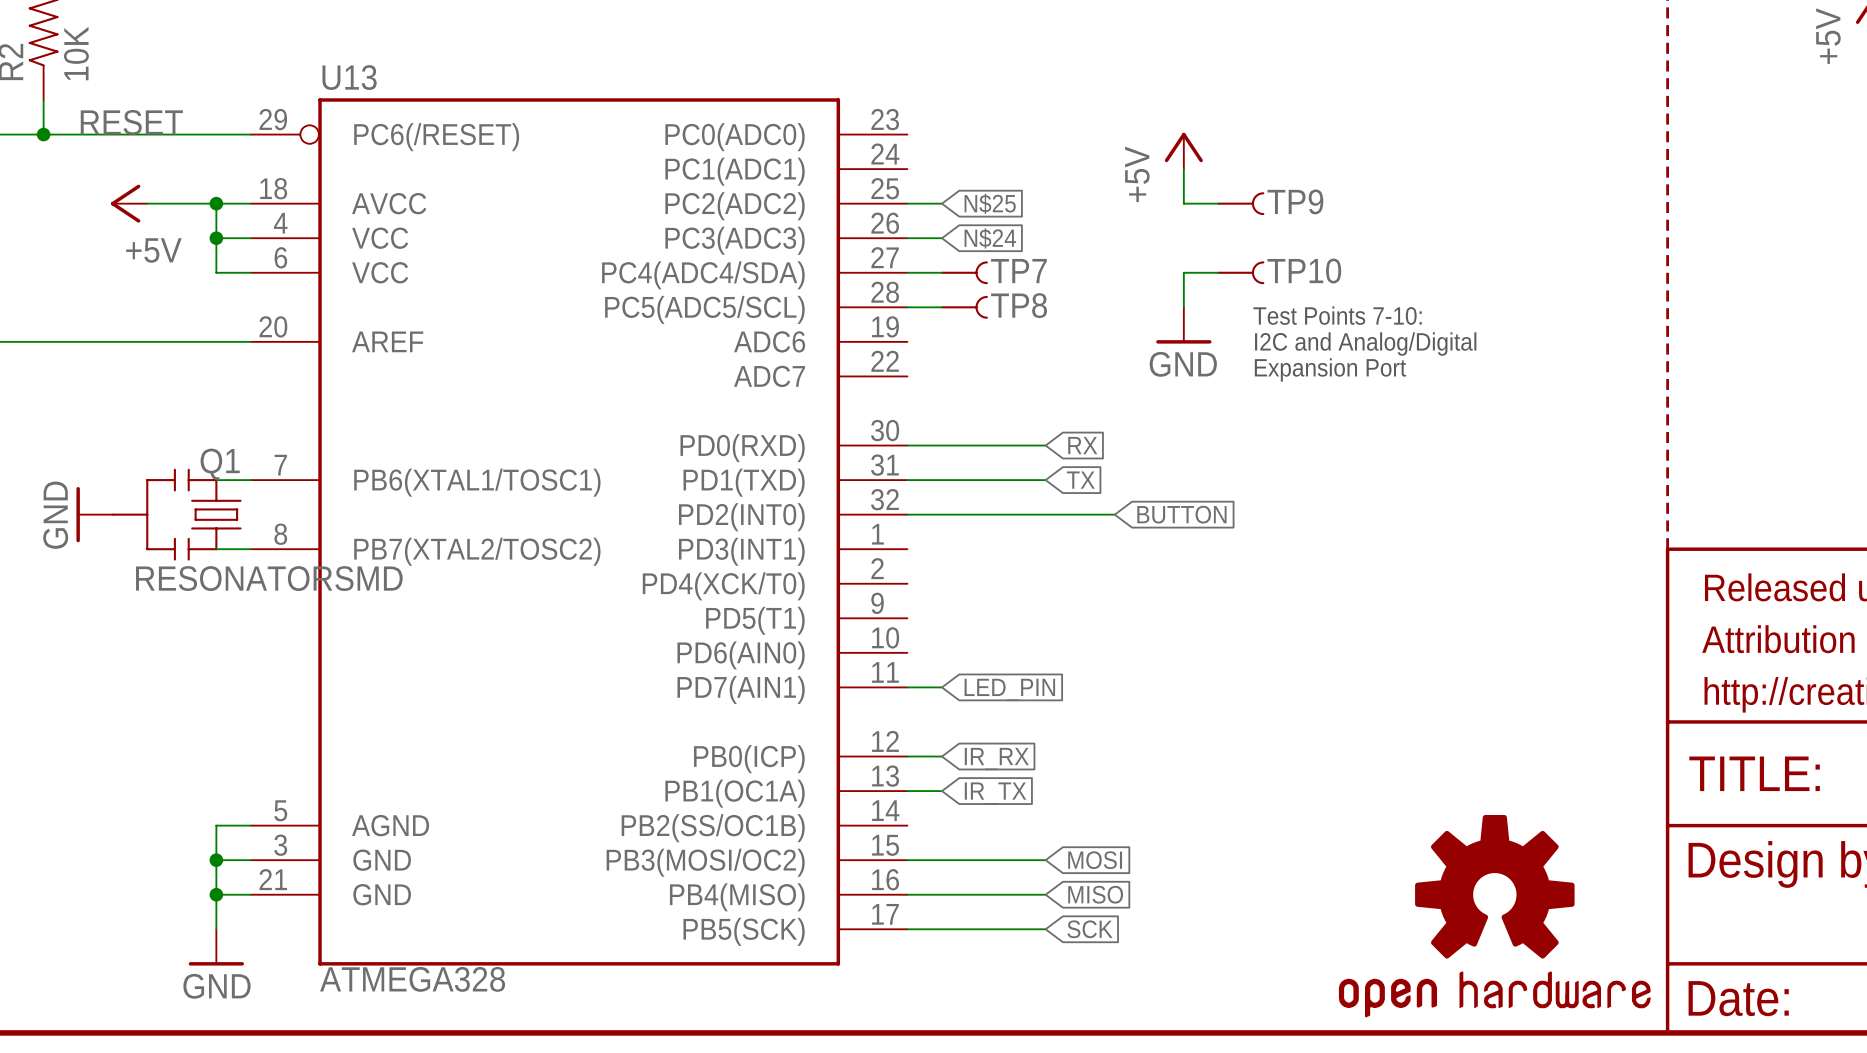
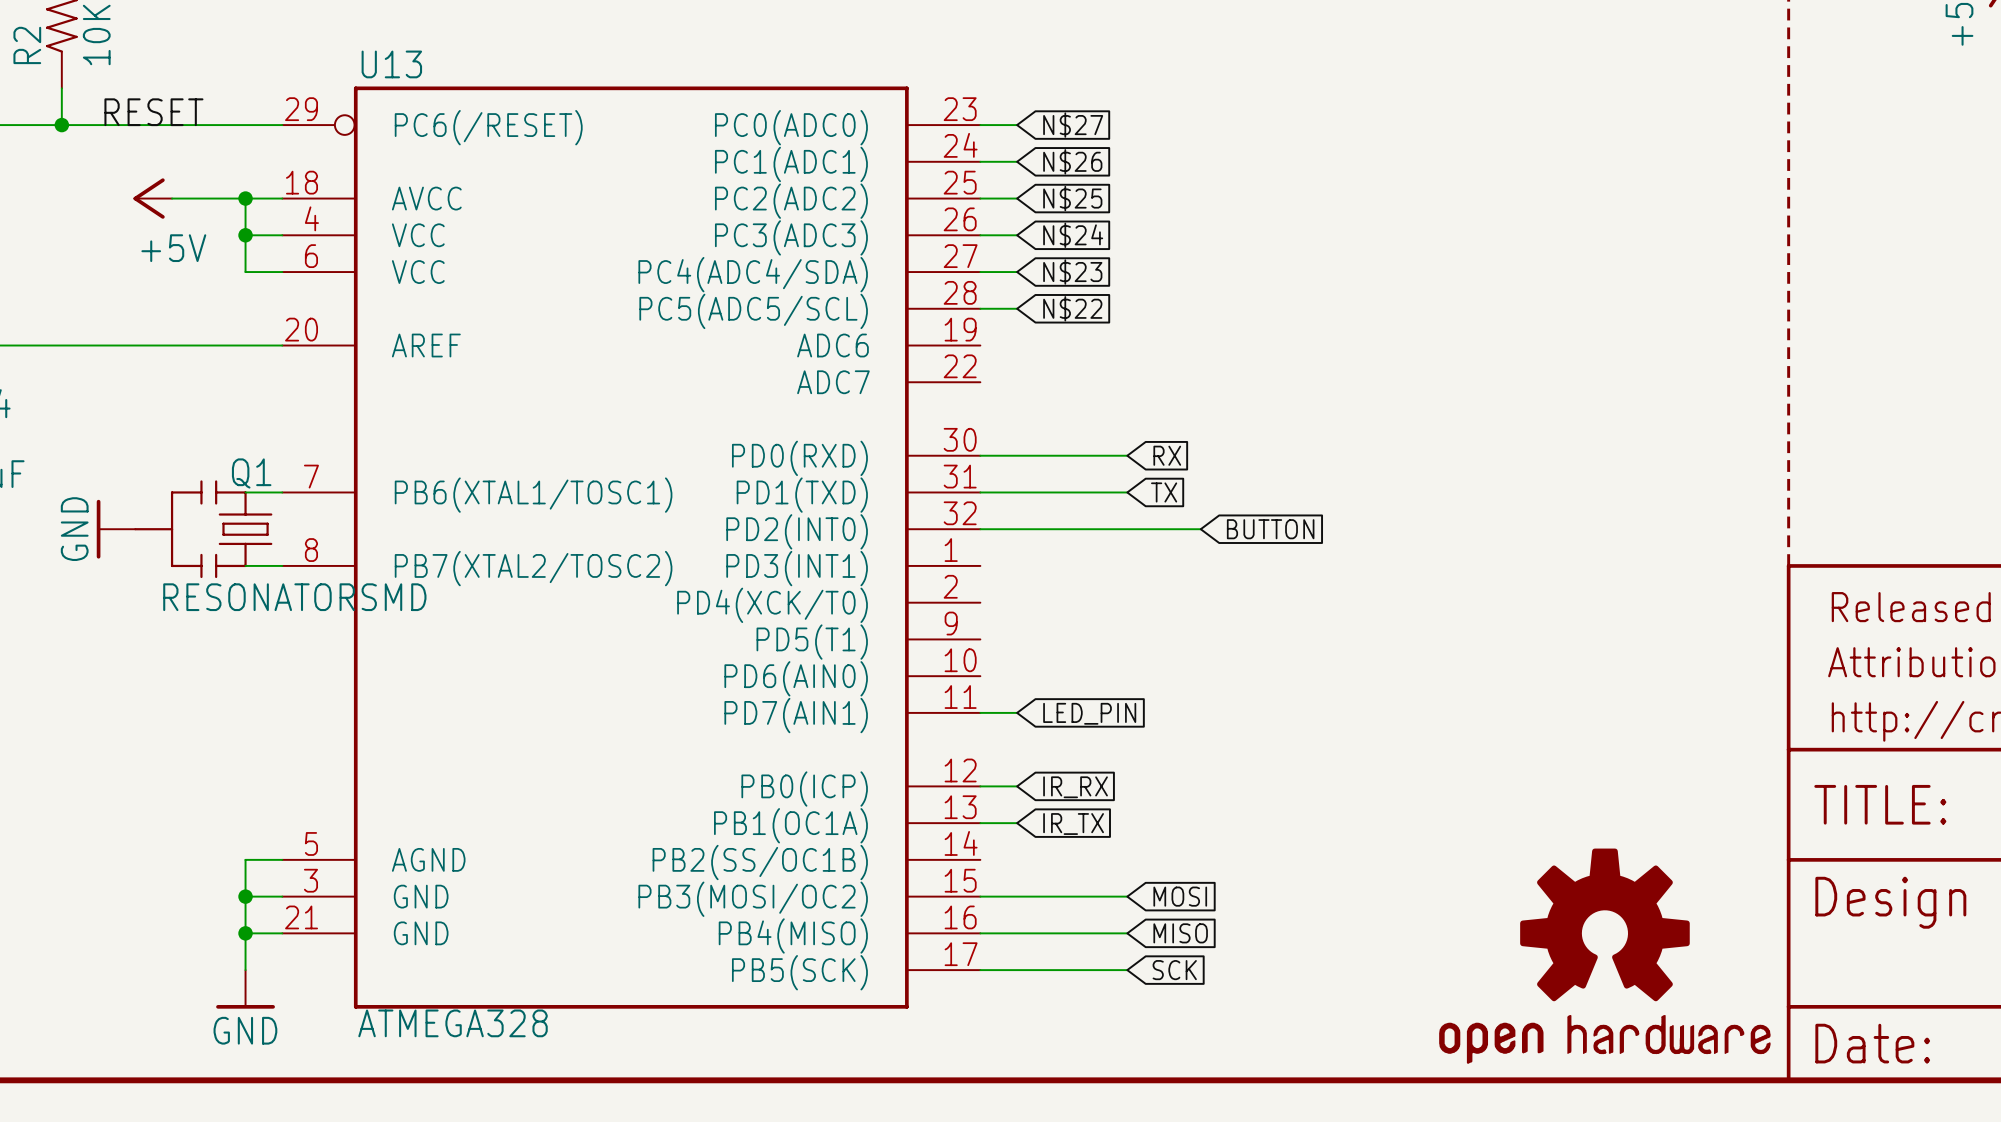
wire: none -> (980, 125) (1017, 125)
global label: none -> N$27 (1073, 125)
power symbol: +5V (1183, 150) -> none
wire: none -> (980, 161) (1017, 161)
global label: none -> N$26 (1072, 161)
wire: (1183, 169) (1183, 203) (1218, 203) -> none
TP9: (1240, 203) -> none
TP7: (964, 272) -> none
global label: none -> N$23 (1072, 272)
wire: (1218, 272) (1183, 272) (1183, 307) -> none
TP10: (1240, 272) -> none
TP8: (964, 307) -> none
global label: none -> N$22 (1072, 308)
text: Test Points 7-10: (1337, 315) -> none
power symbol: GND (1183, 325) -> none
text: I2C and Analog/Digital (1365, 344) -> none
text: Expansion Port (1330, 369) -> none

